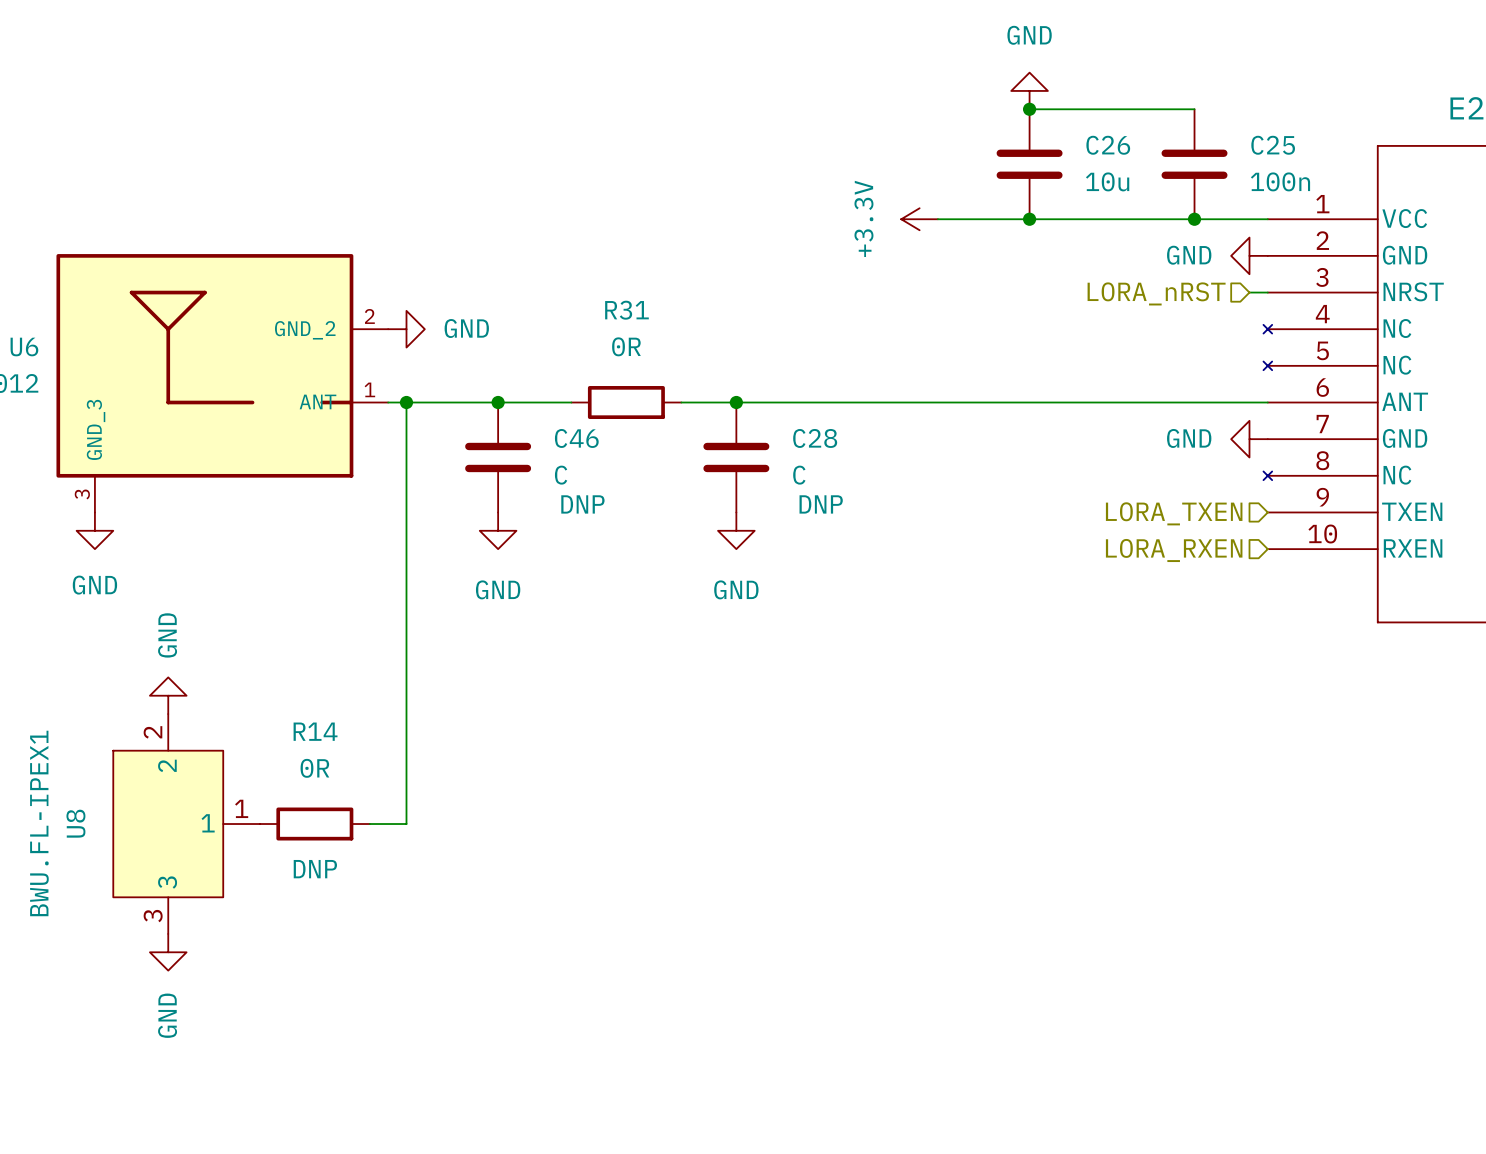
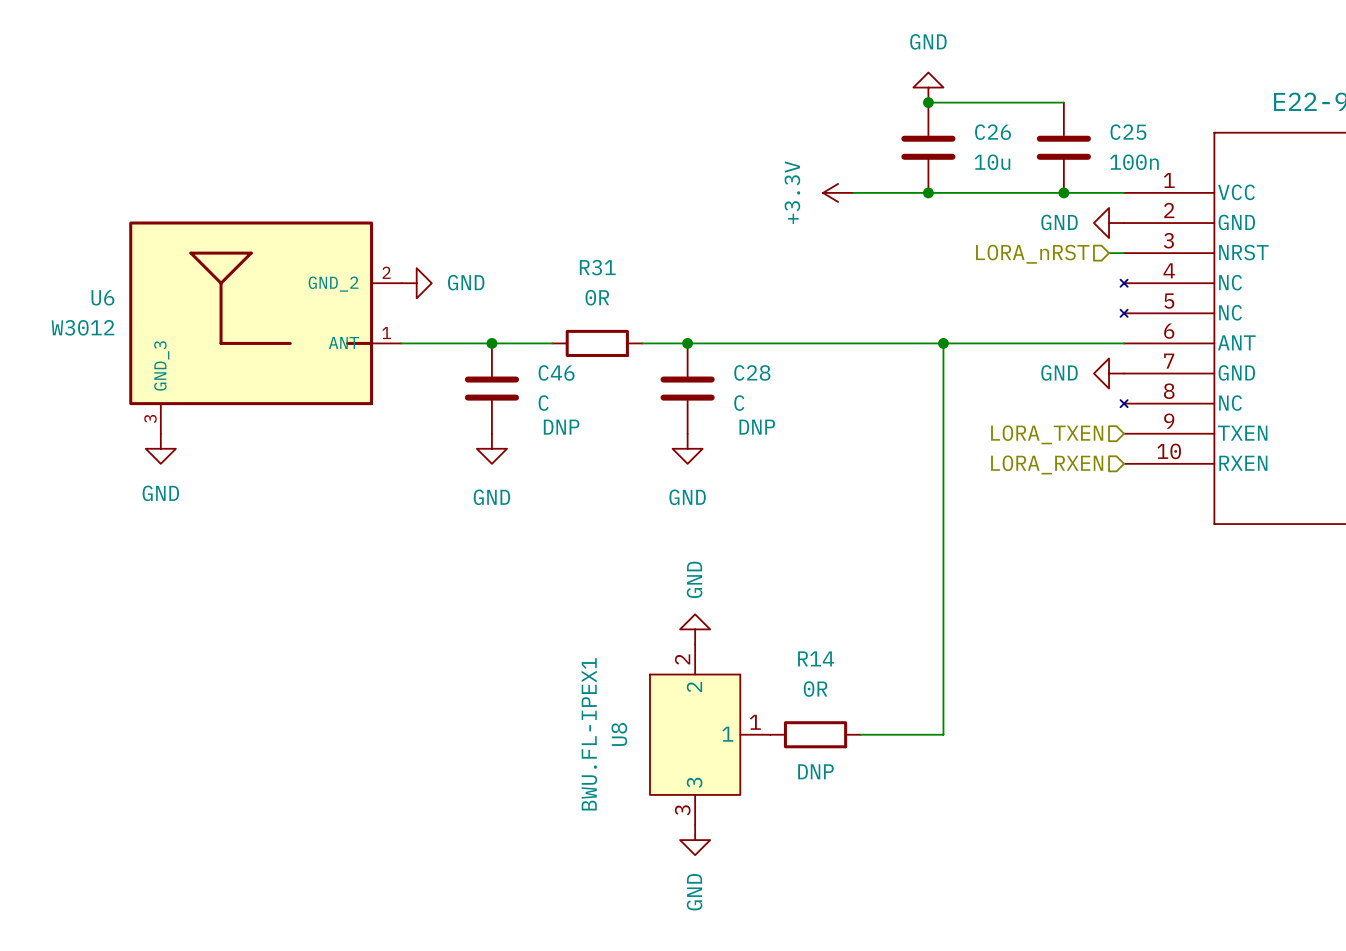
wire: (406, 402) (406, 824) (369, 824) -> none
junction: (406, 402) -> none
wire: none -> (943, 343) (943, 734) (860, 734)
junction: none -> (943, 343)
power symbol: GND (168, 695) -> none
power symbol: none -> GND (695, 629)
U8 position: (186, 824) -> (710, 734)
R14 position: (314, 824) -> (815, 734)
power symbol: GND (168, 952) -> none
power symbol: none -> GND (695, 840)

